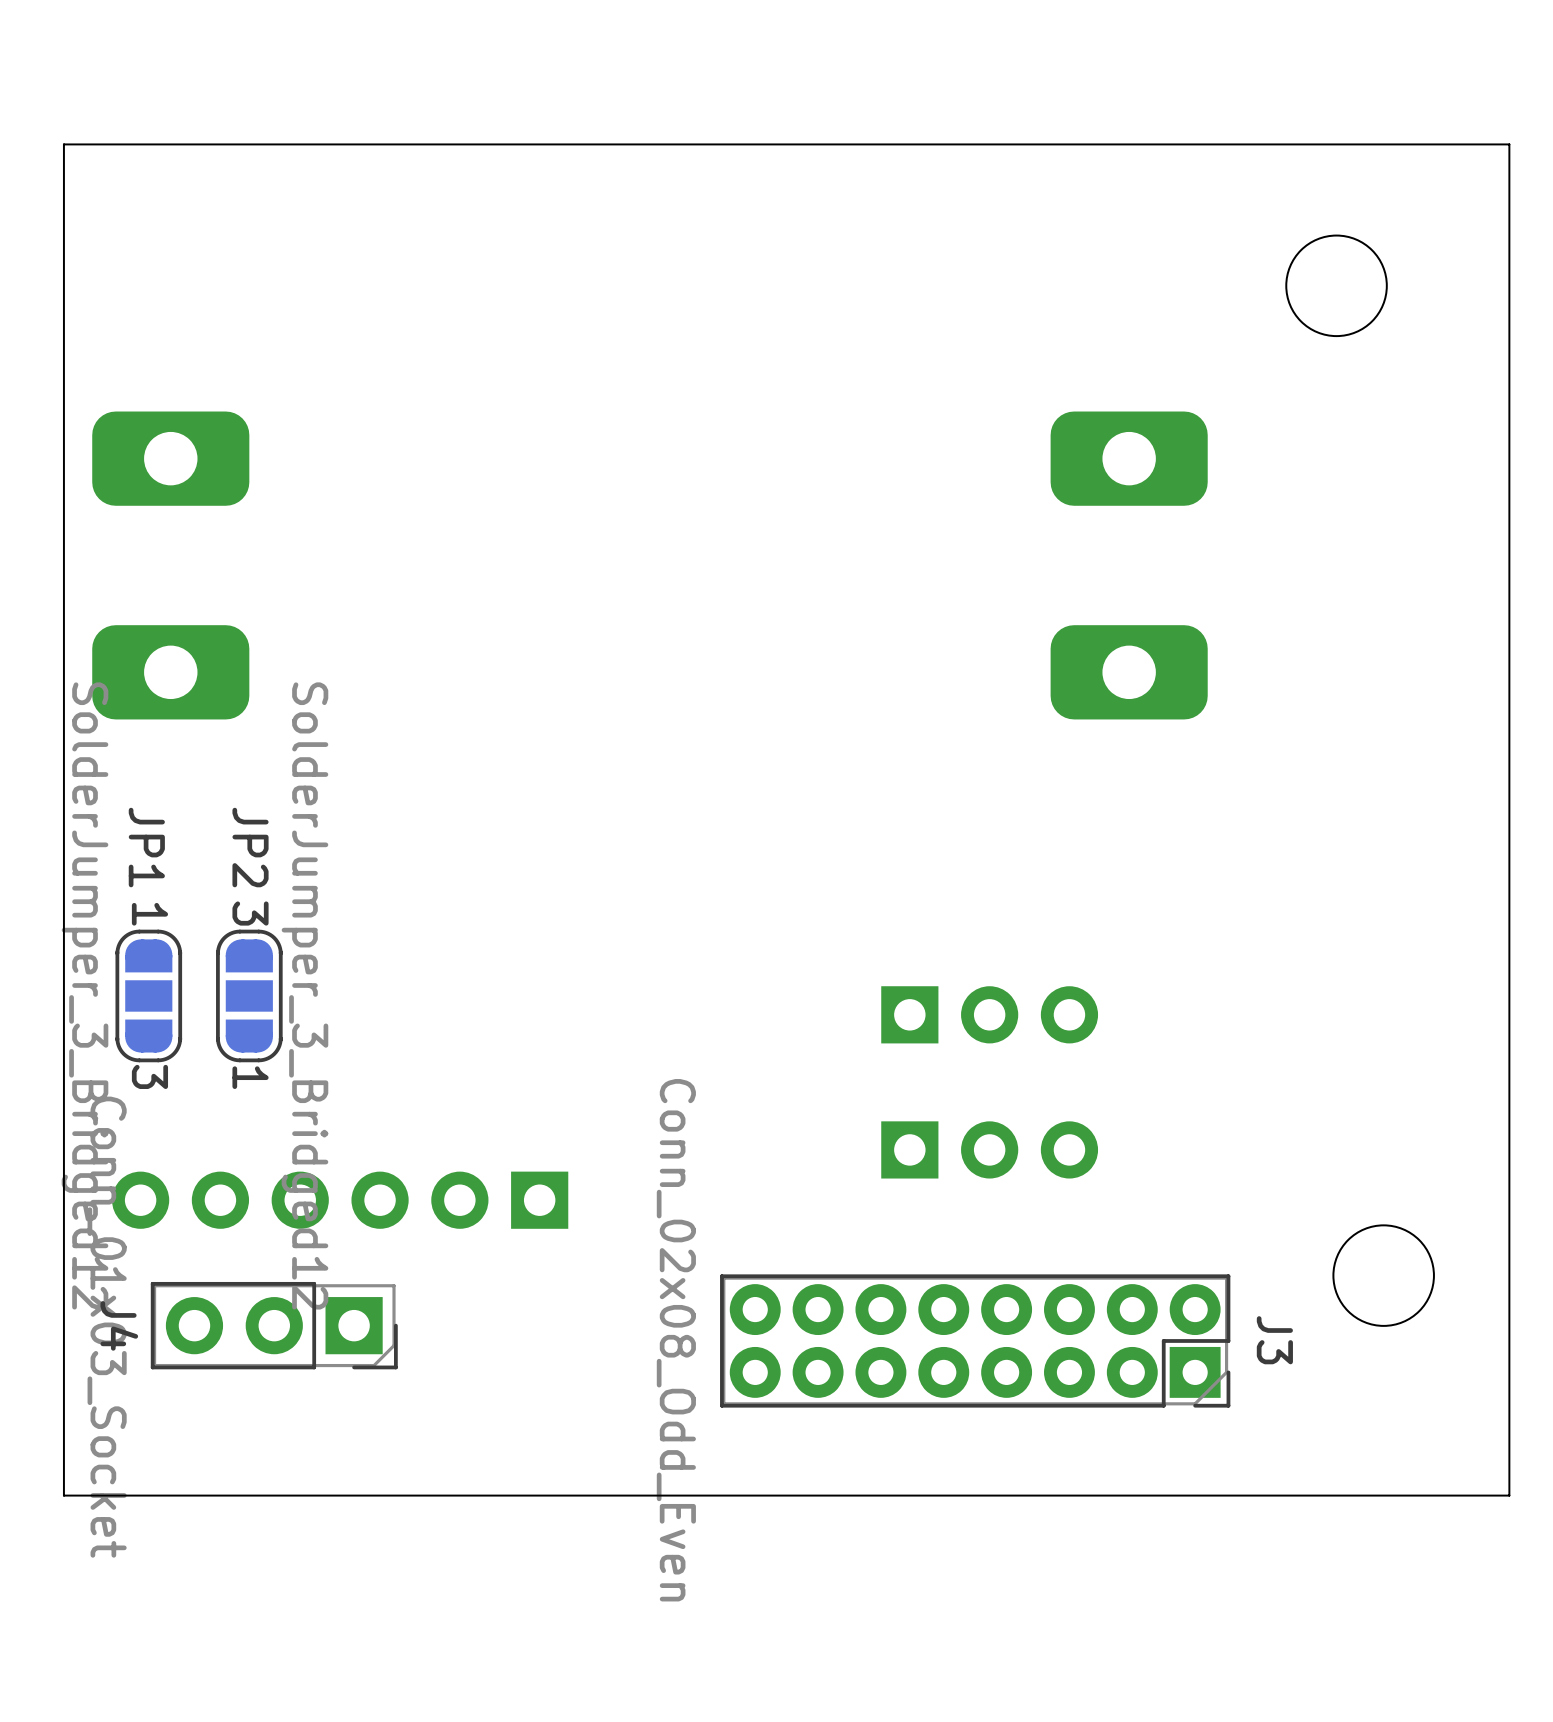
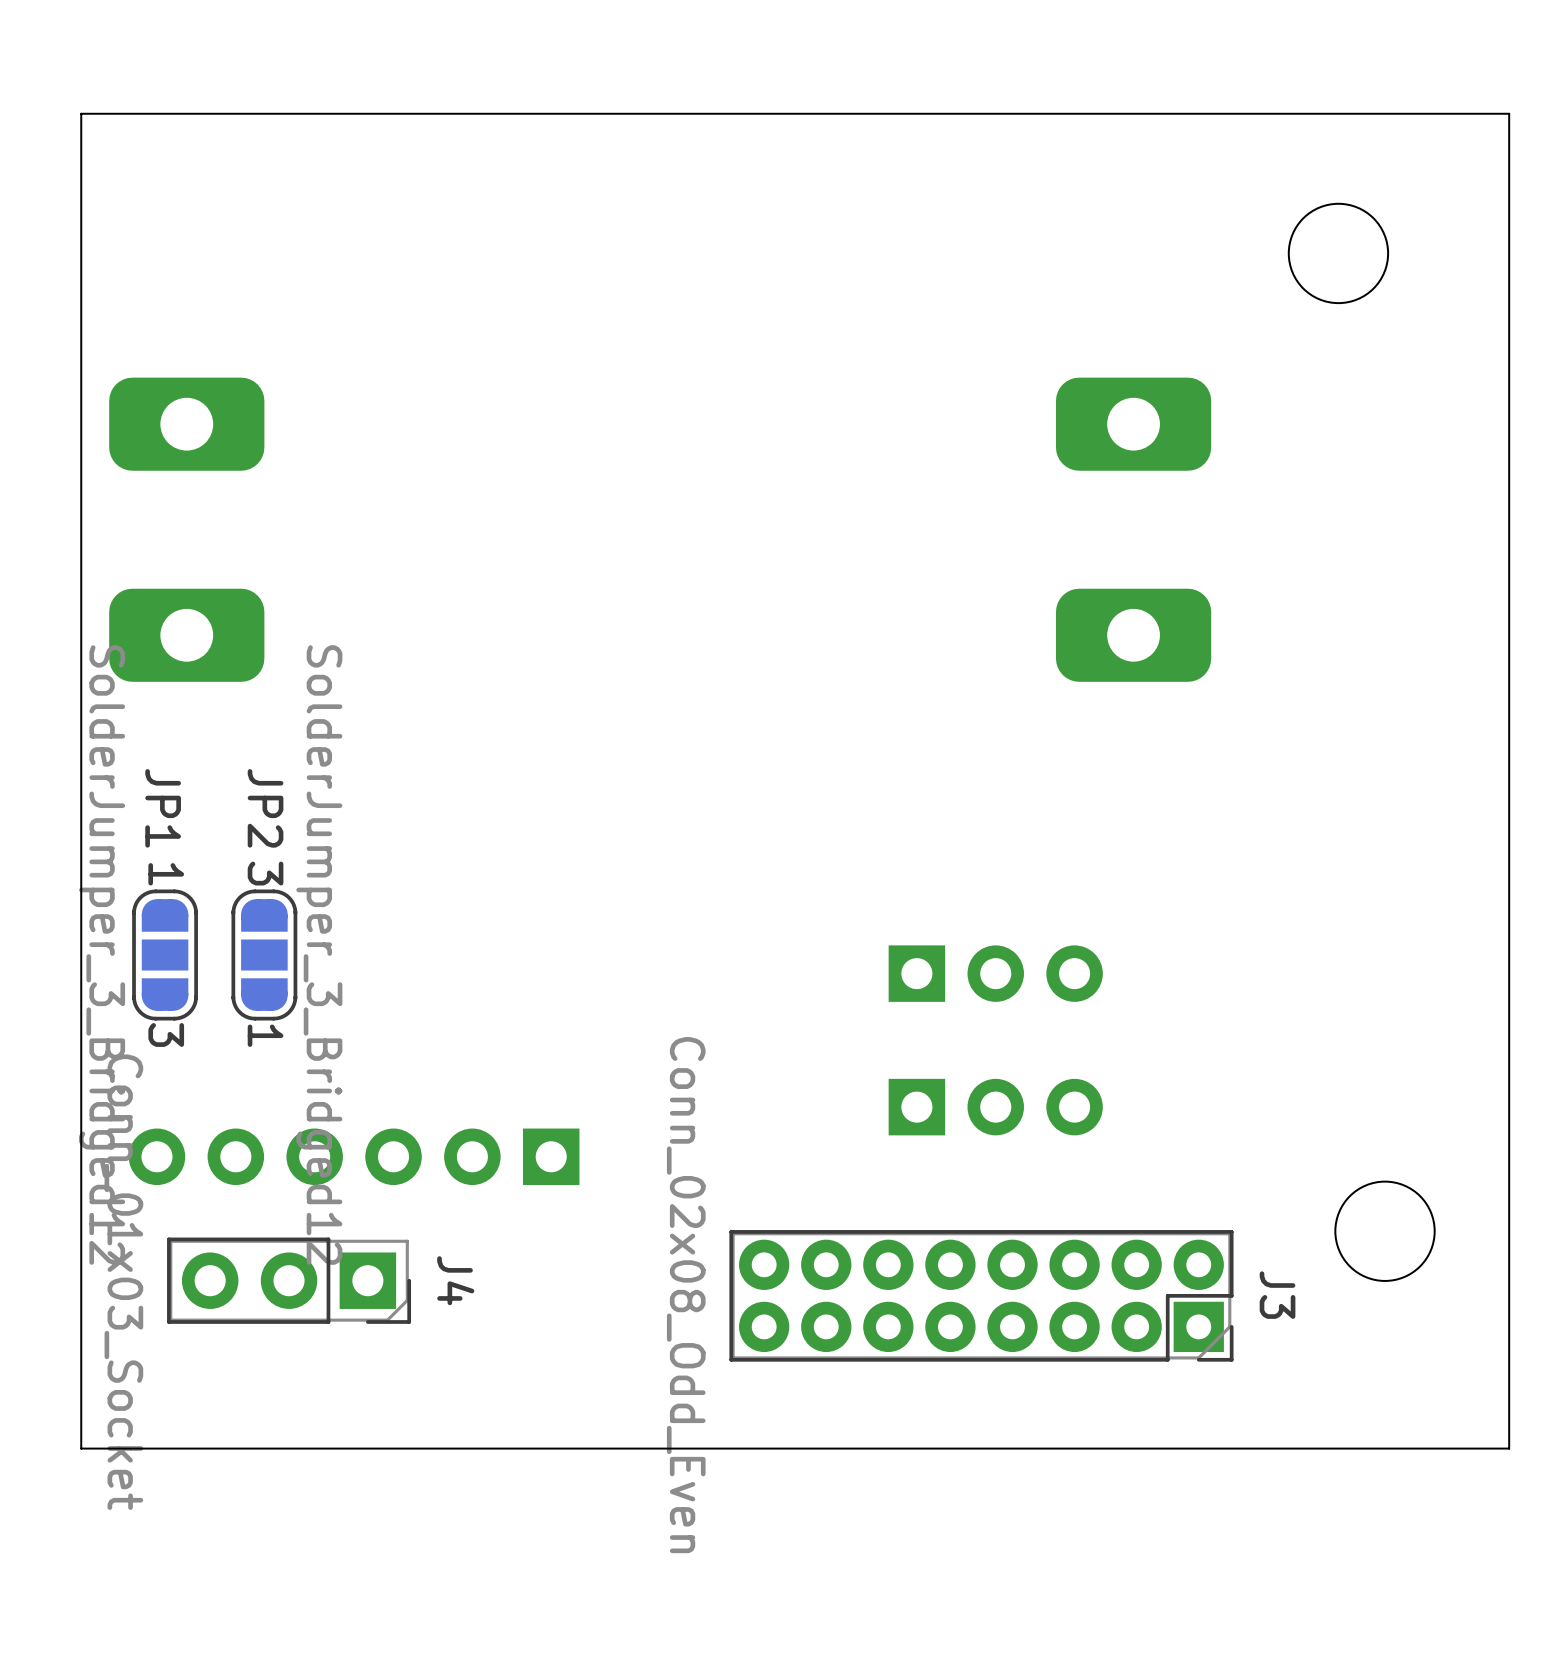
J4 name position: J4 (119, 1325) -> J4 (455, 1280)

